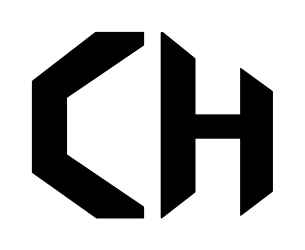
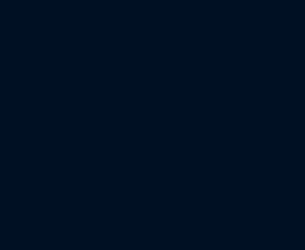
drawing: [31, 31, 273, 219] -> none

